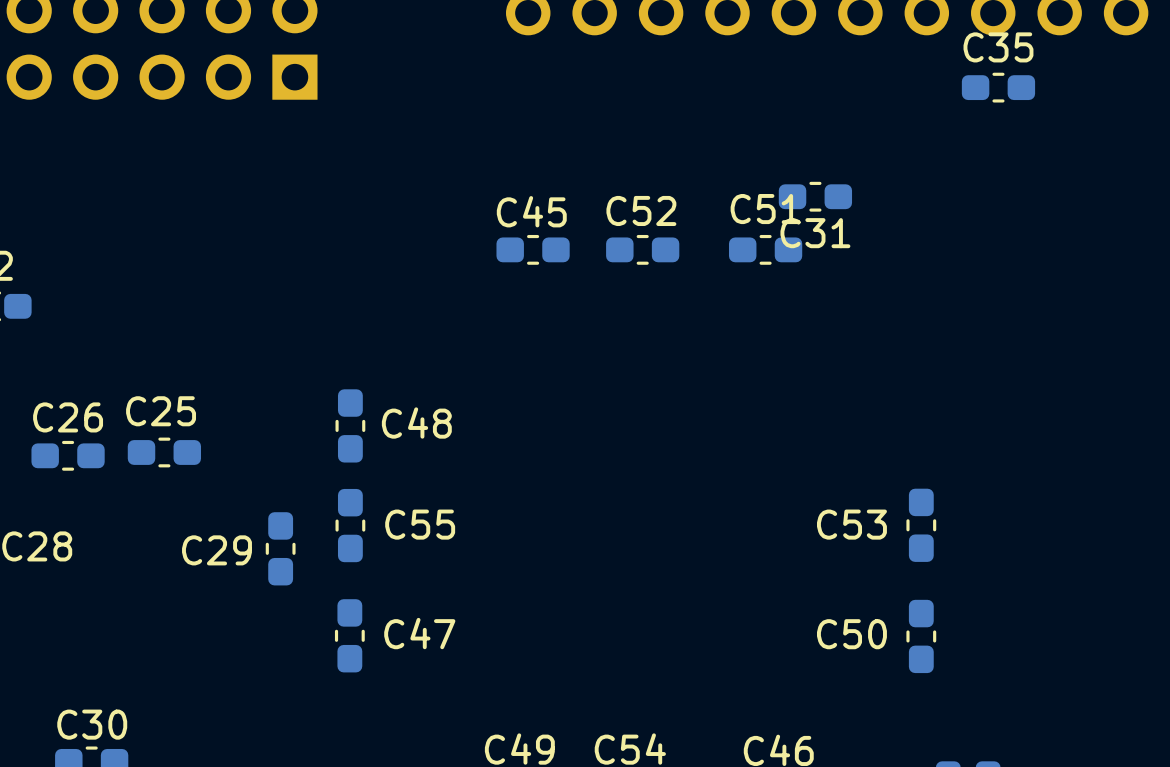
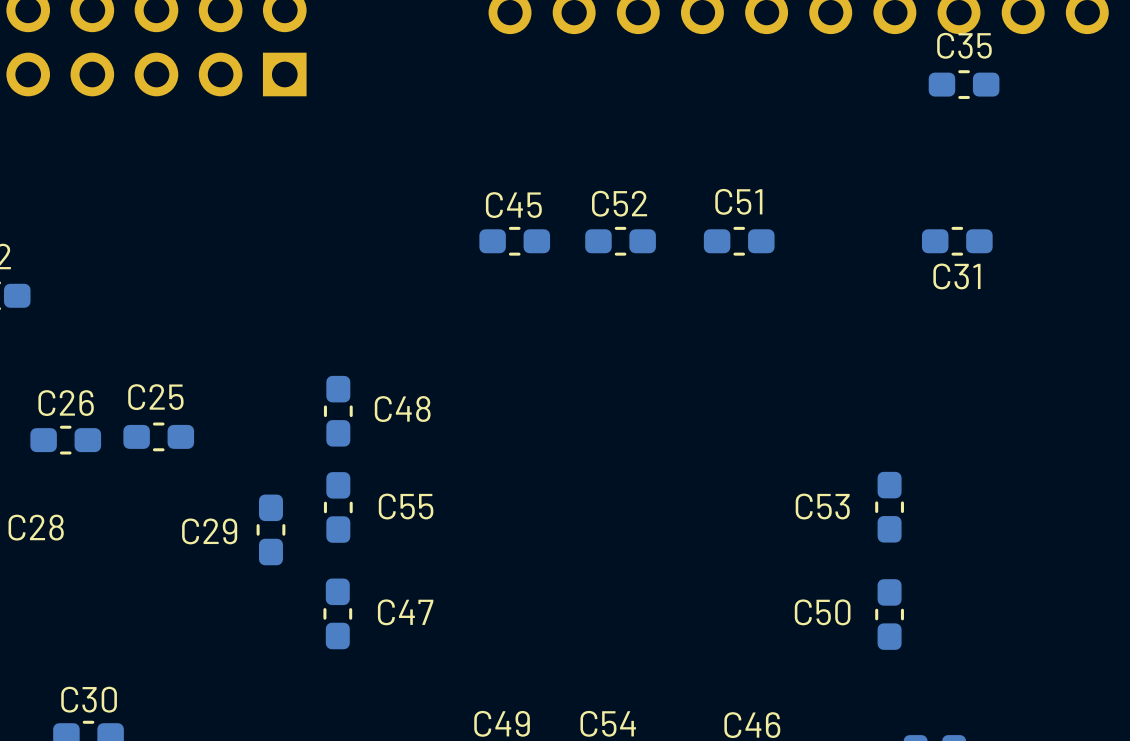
C31 position: (815, 196) -> (957, 241)

